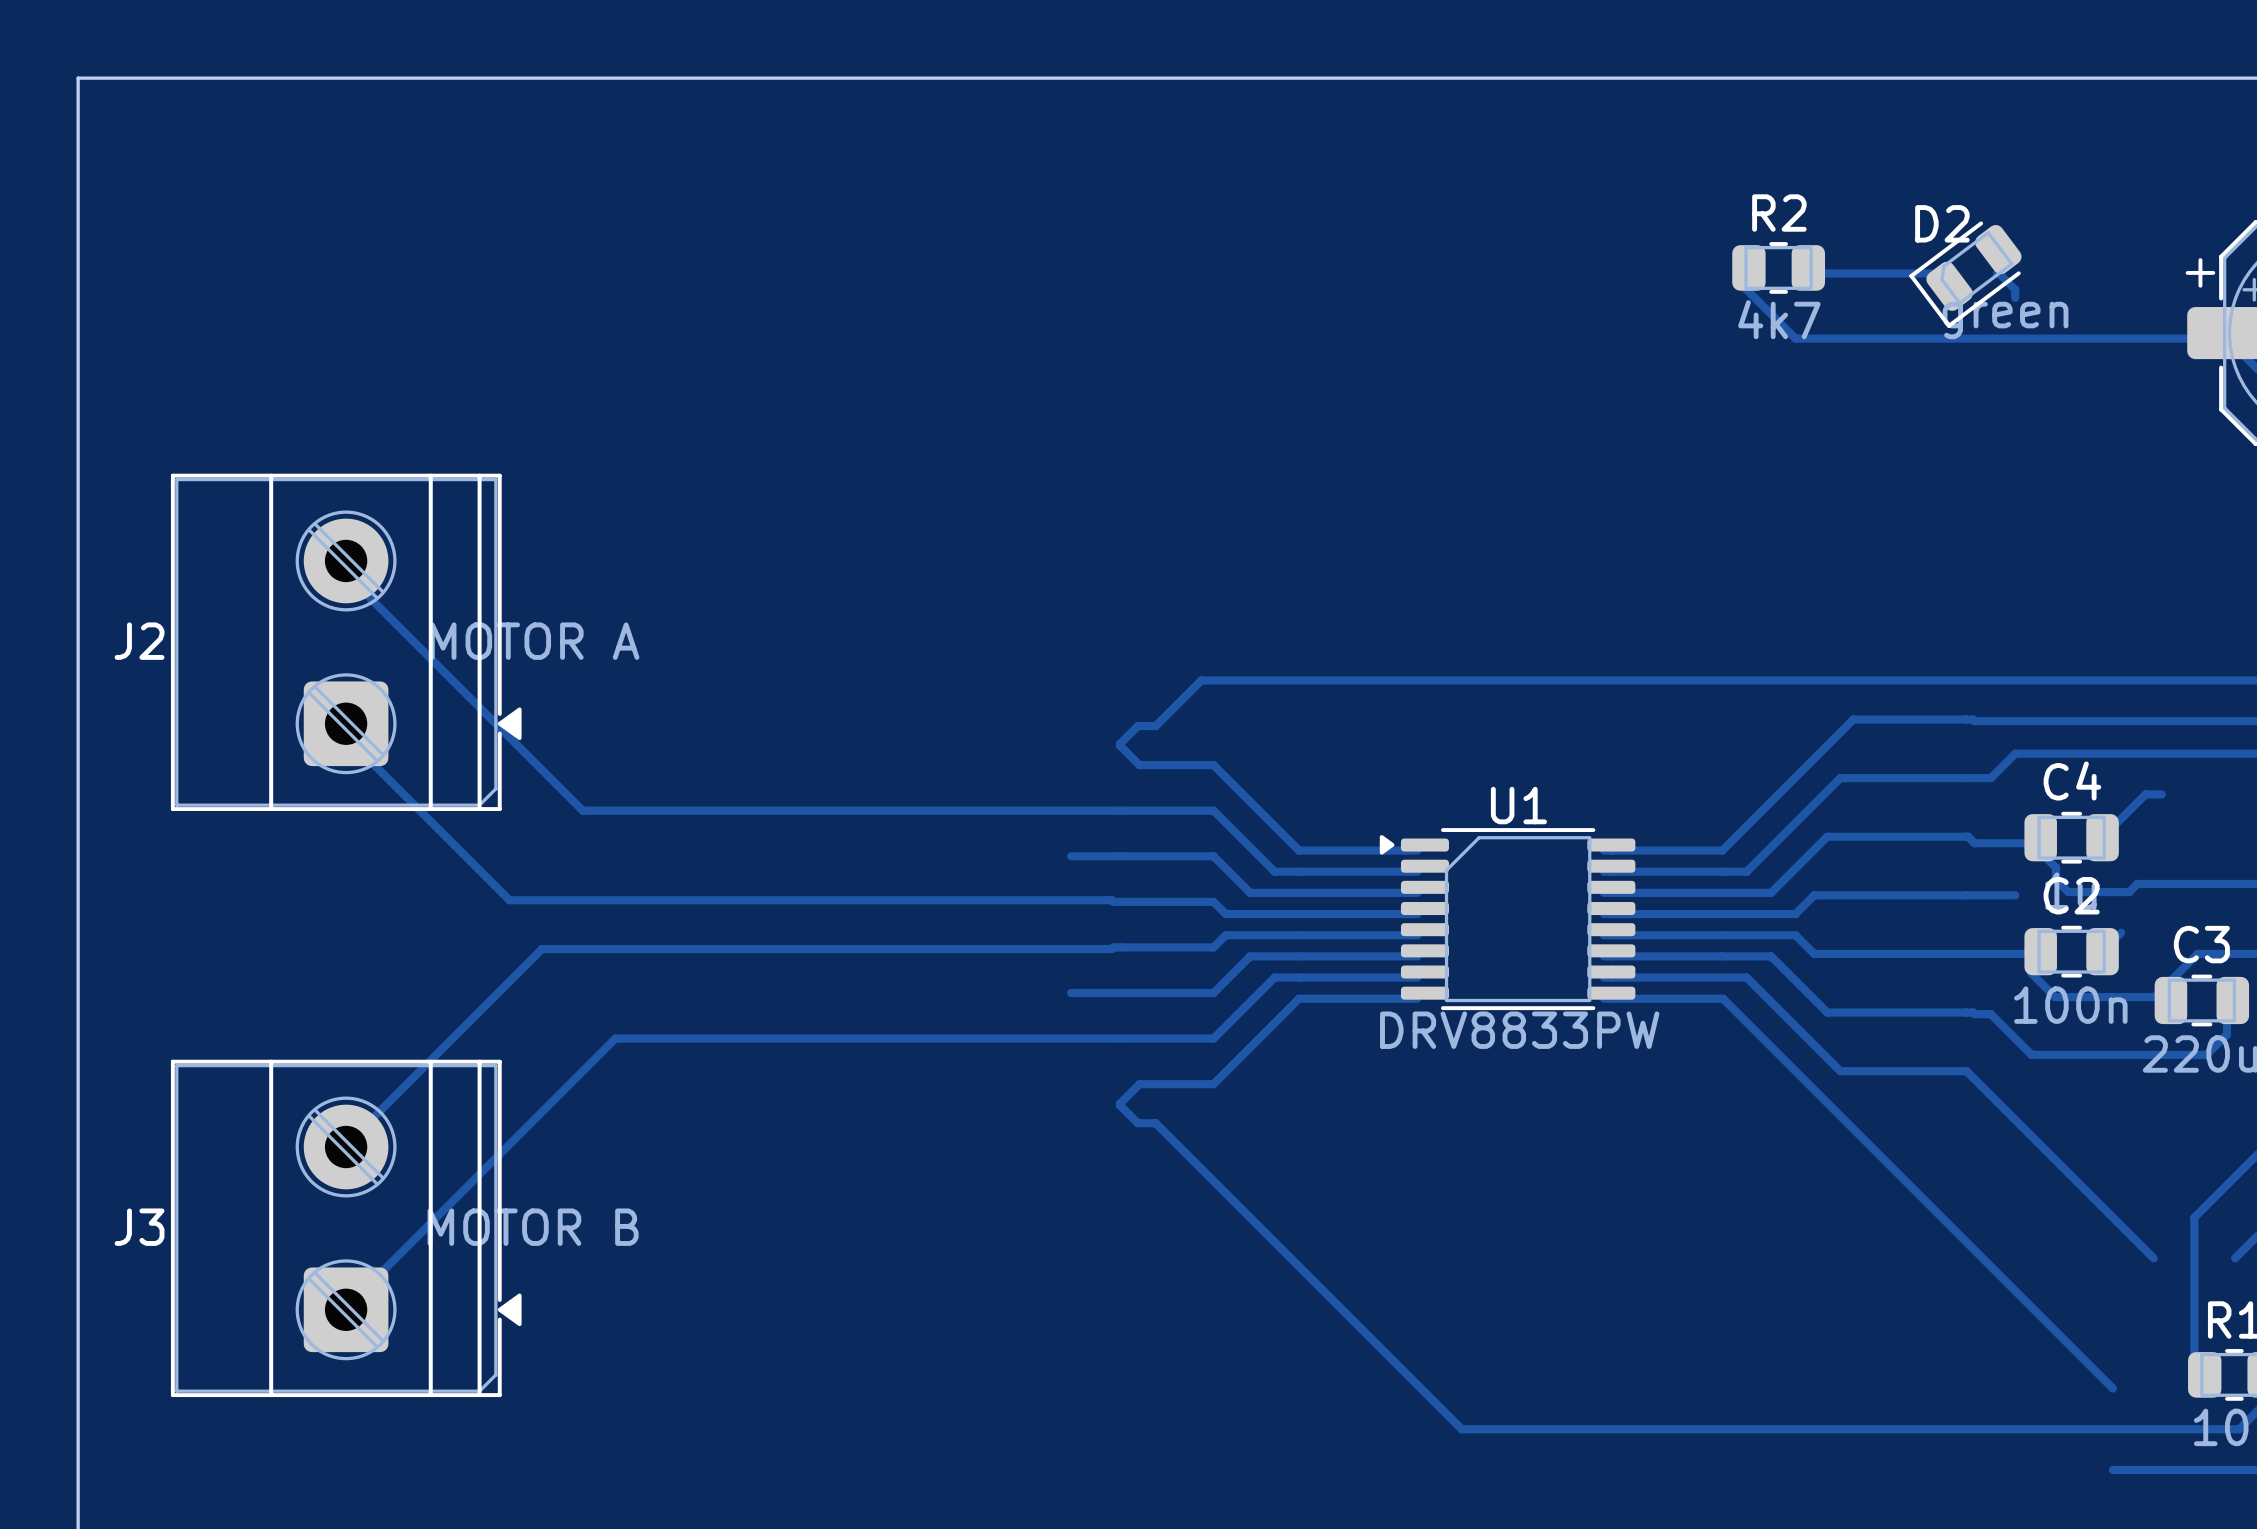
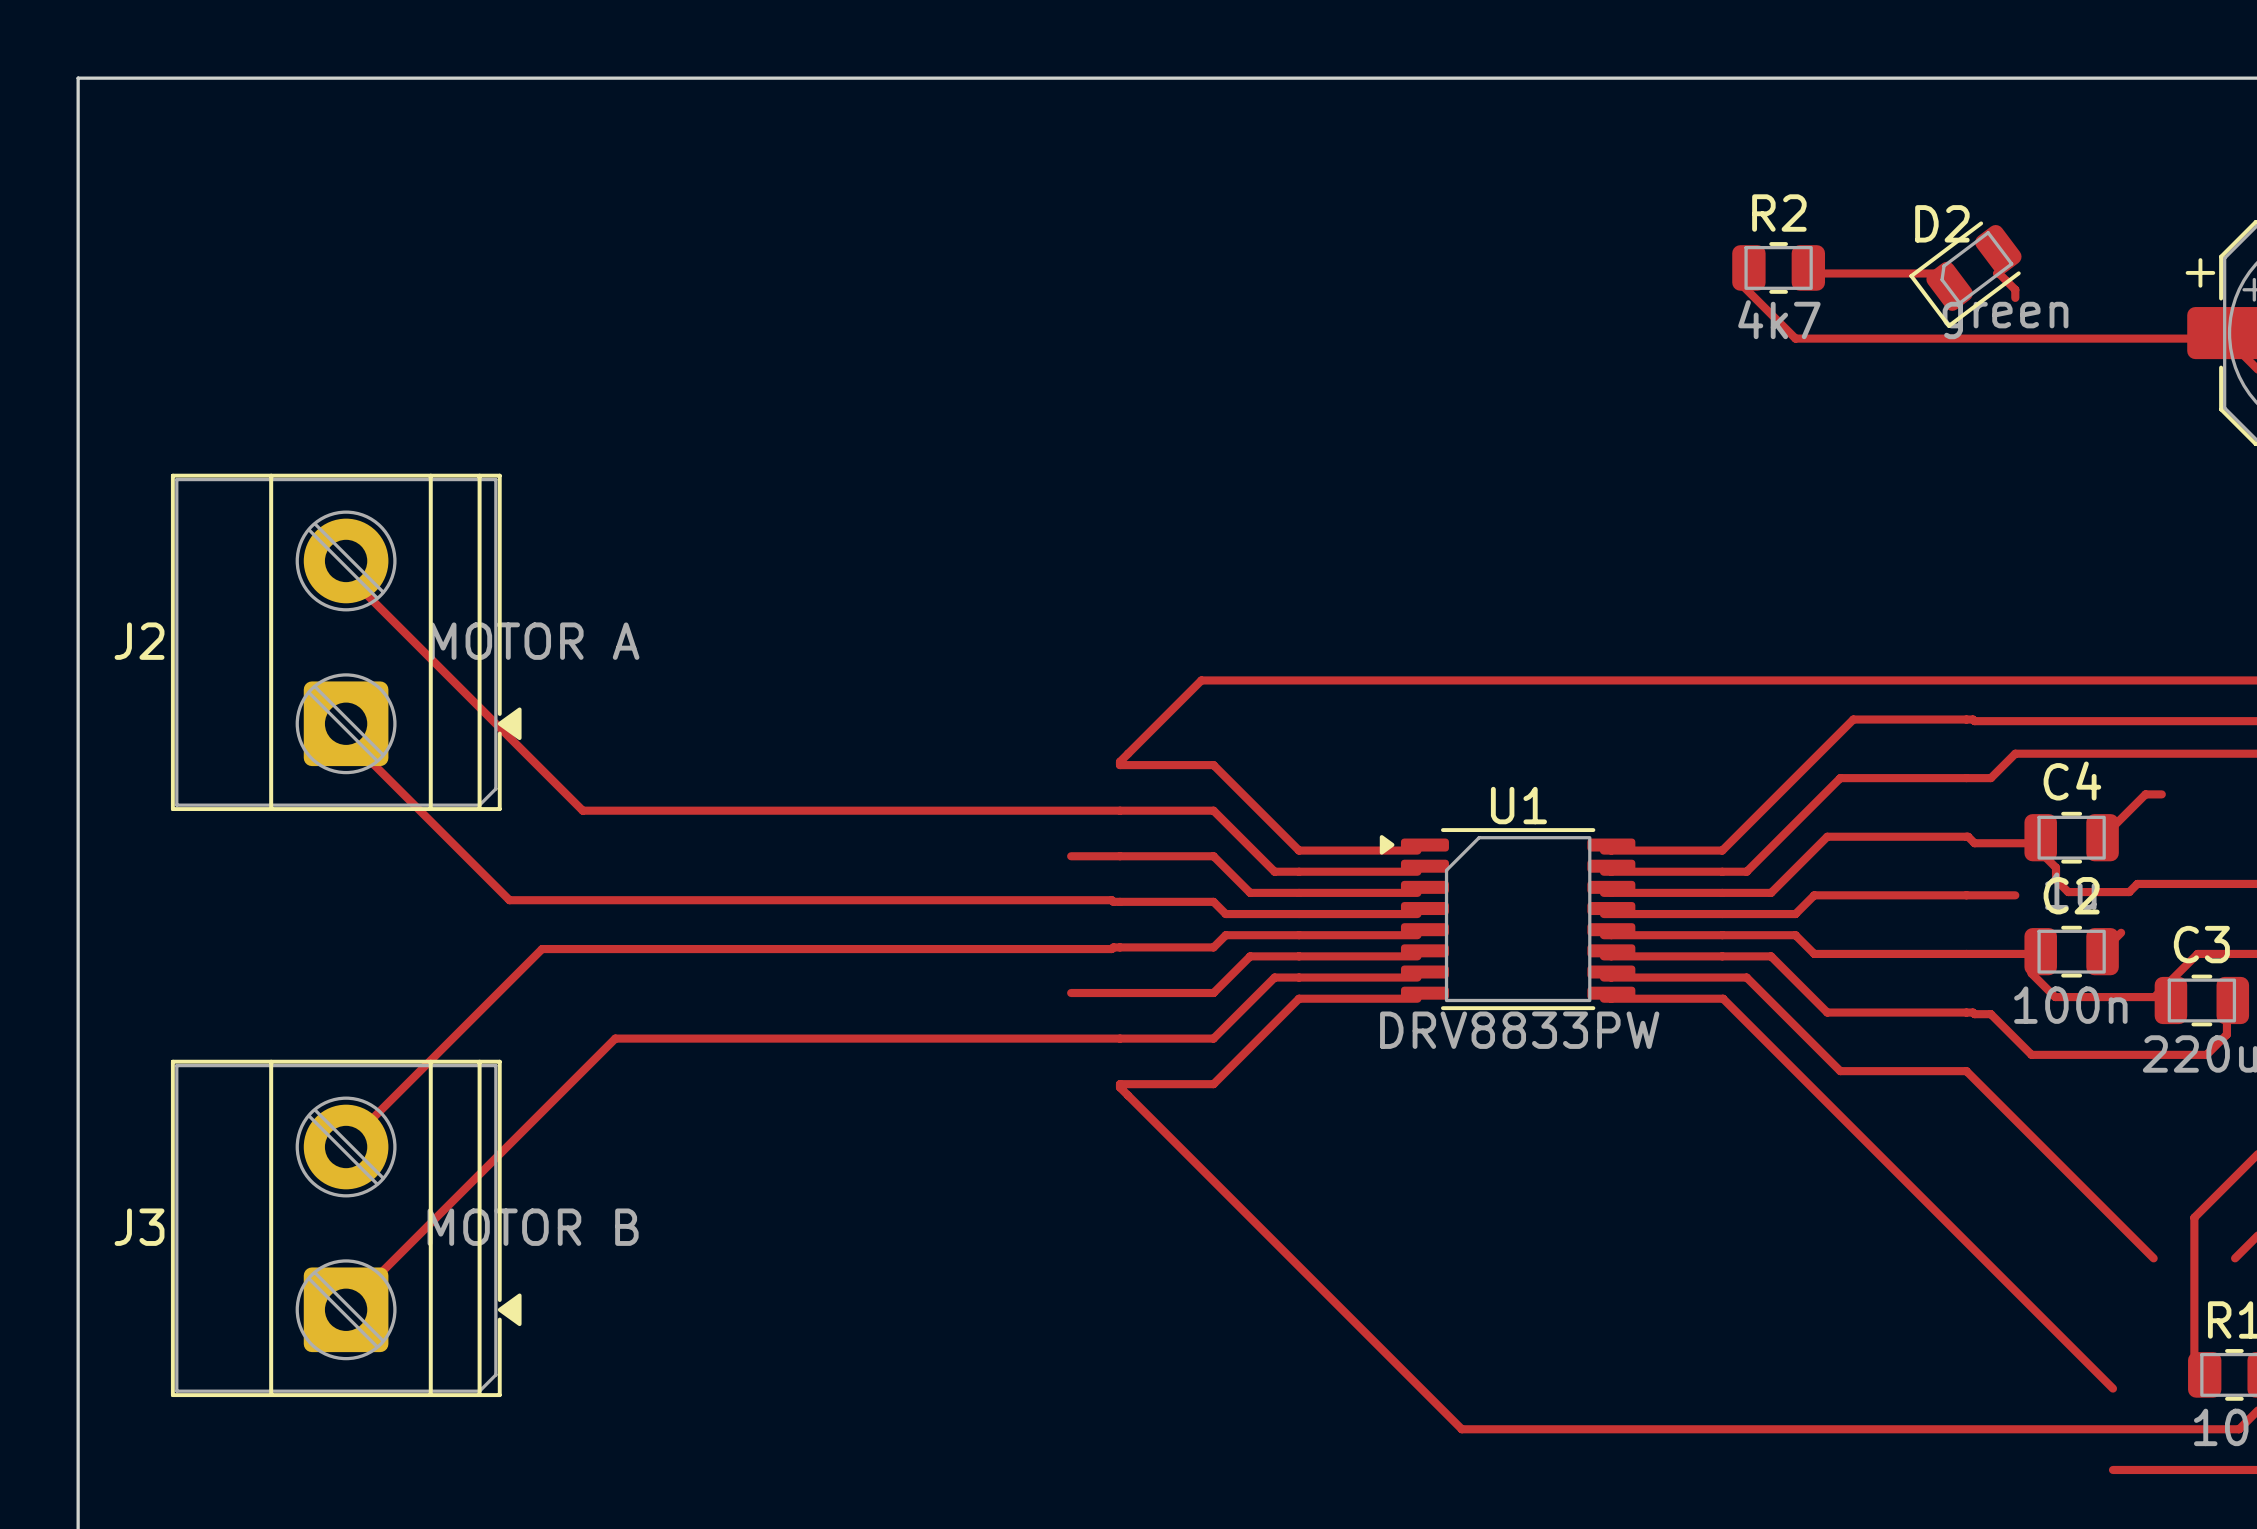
track: (1155, 726) (1137, 726) (1119, 743) (1139, 765) -> (1155, 726) (1119, 761) (1119, 765) (1139, 765)
track: (1139, 1084) (1119, 1105) (1137, 1123) (1155, 1123) -> (1139, 1084) (1119, 1084) (1119, 1087) (1155, 1123)

